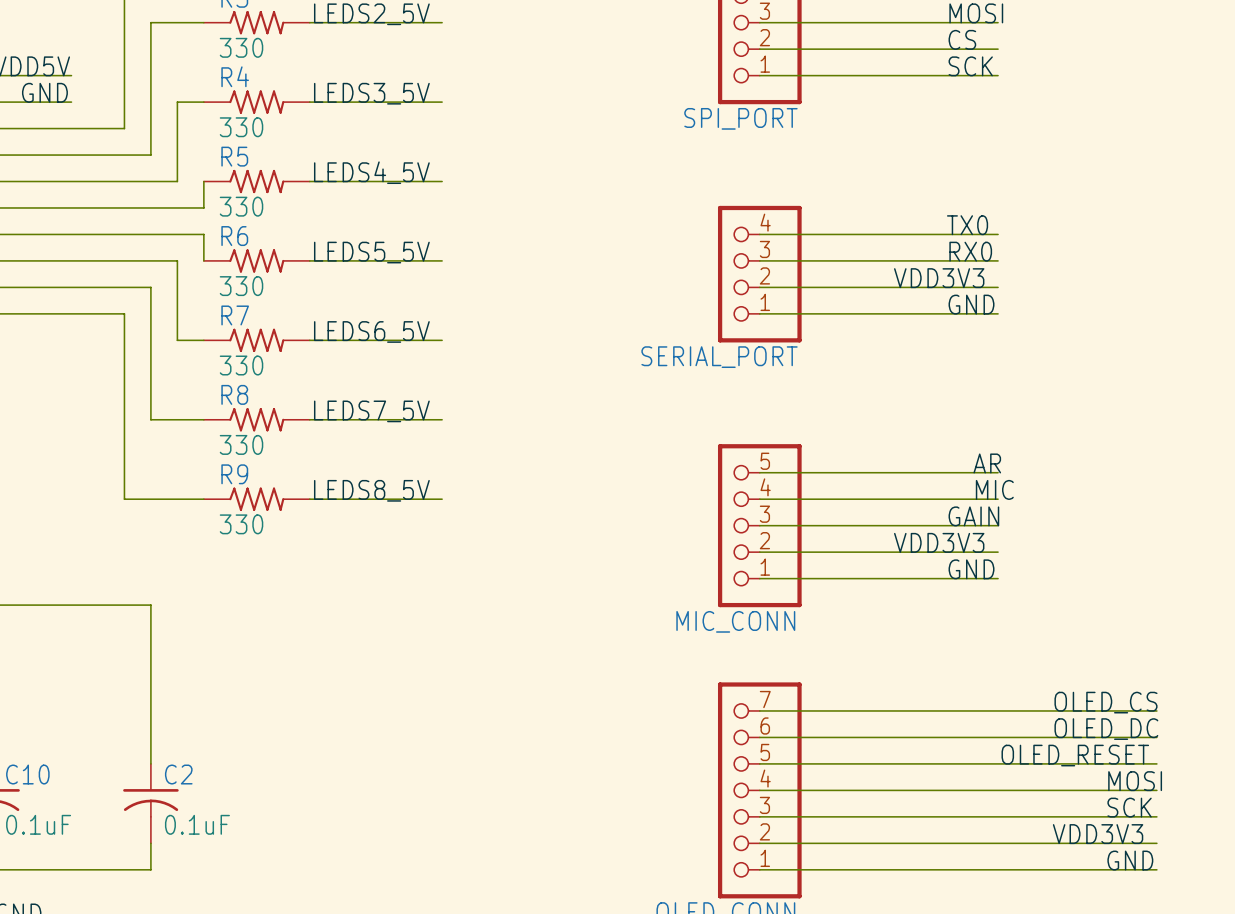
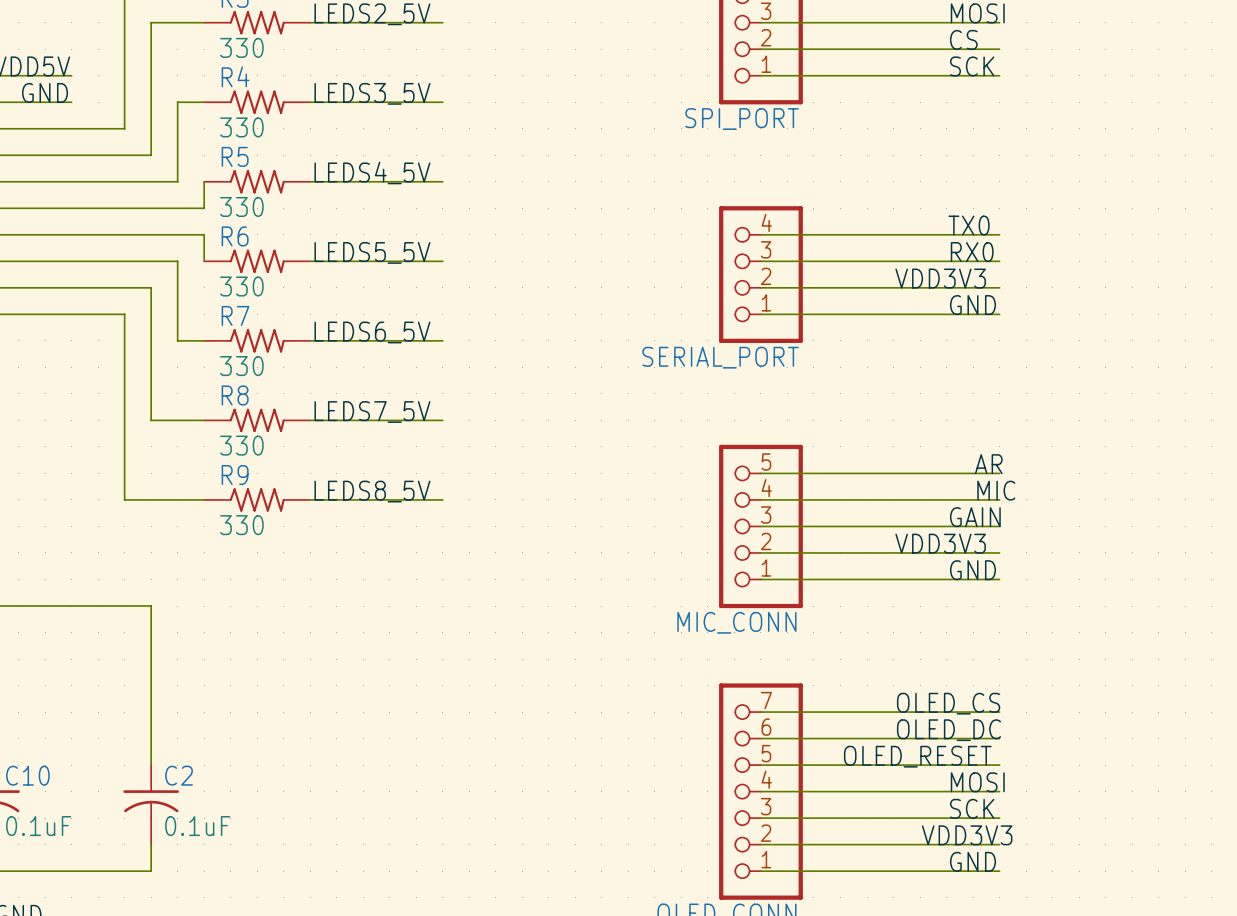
label position: OLED_CS (1106, 702) -> OLED_CS (948, 703)
wire: (998, 710) (1156, 710) -> none
label position: OLED_DC (1106, 729) -> OLED_DC (948, 730)
wire: (998, 737) (1156, 737) -> none
label position: OLED_RESET (1075, 755) -> OLED_RESET (917, 756)
wire: (998, 763) (1156, 763) -> none
label position: MOSI (1135, 781) -> MOSI (977, 782)
wire: (998, 790) (1156, 790) -> none
label position: SCK (1129, 807) -> SCK (972, 808)
wire: (998, 816) (1156, 816) -> none
label position: VDD3V3 (1098, 834) -> VDD3V3 (967, 835)
wire: (998, 843) (1156, 843) -> none
label position: GND (1130, 860) -> GND (972, 861)
wire: (998, 869) (1156, 869) -> none

